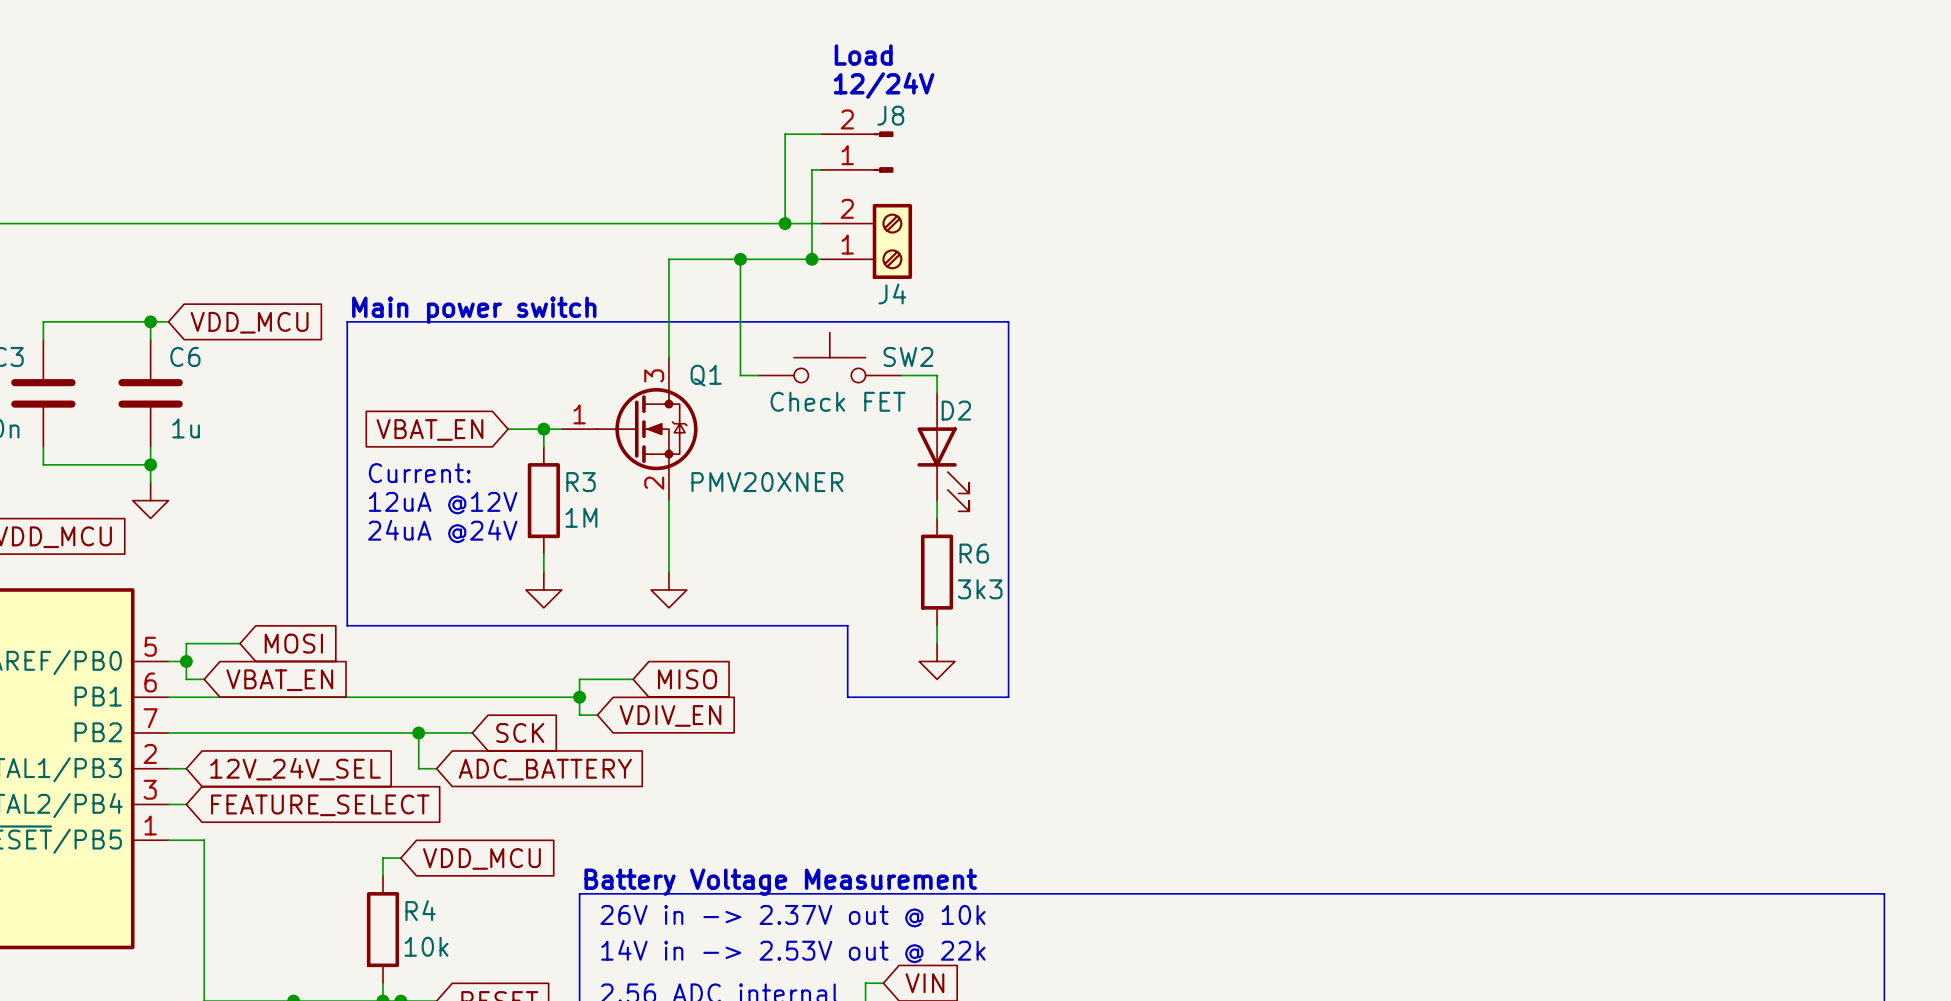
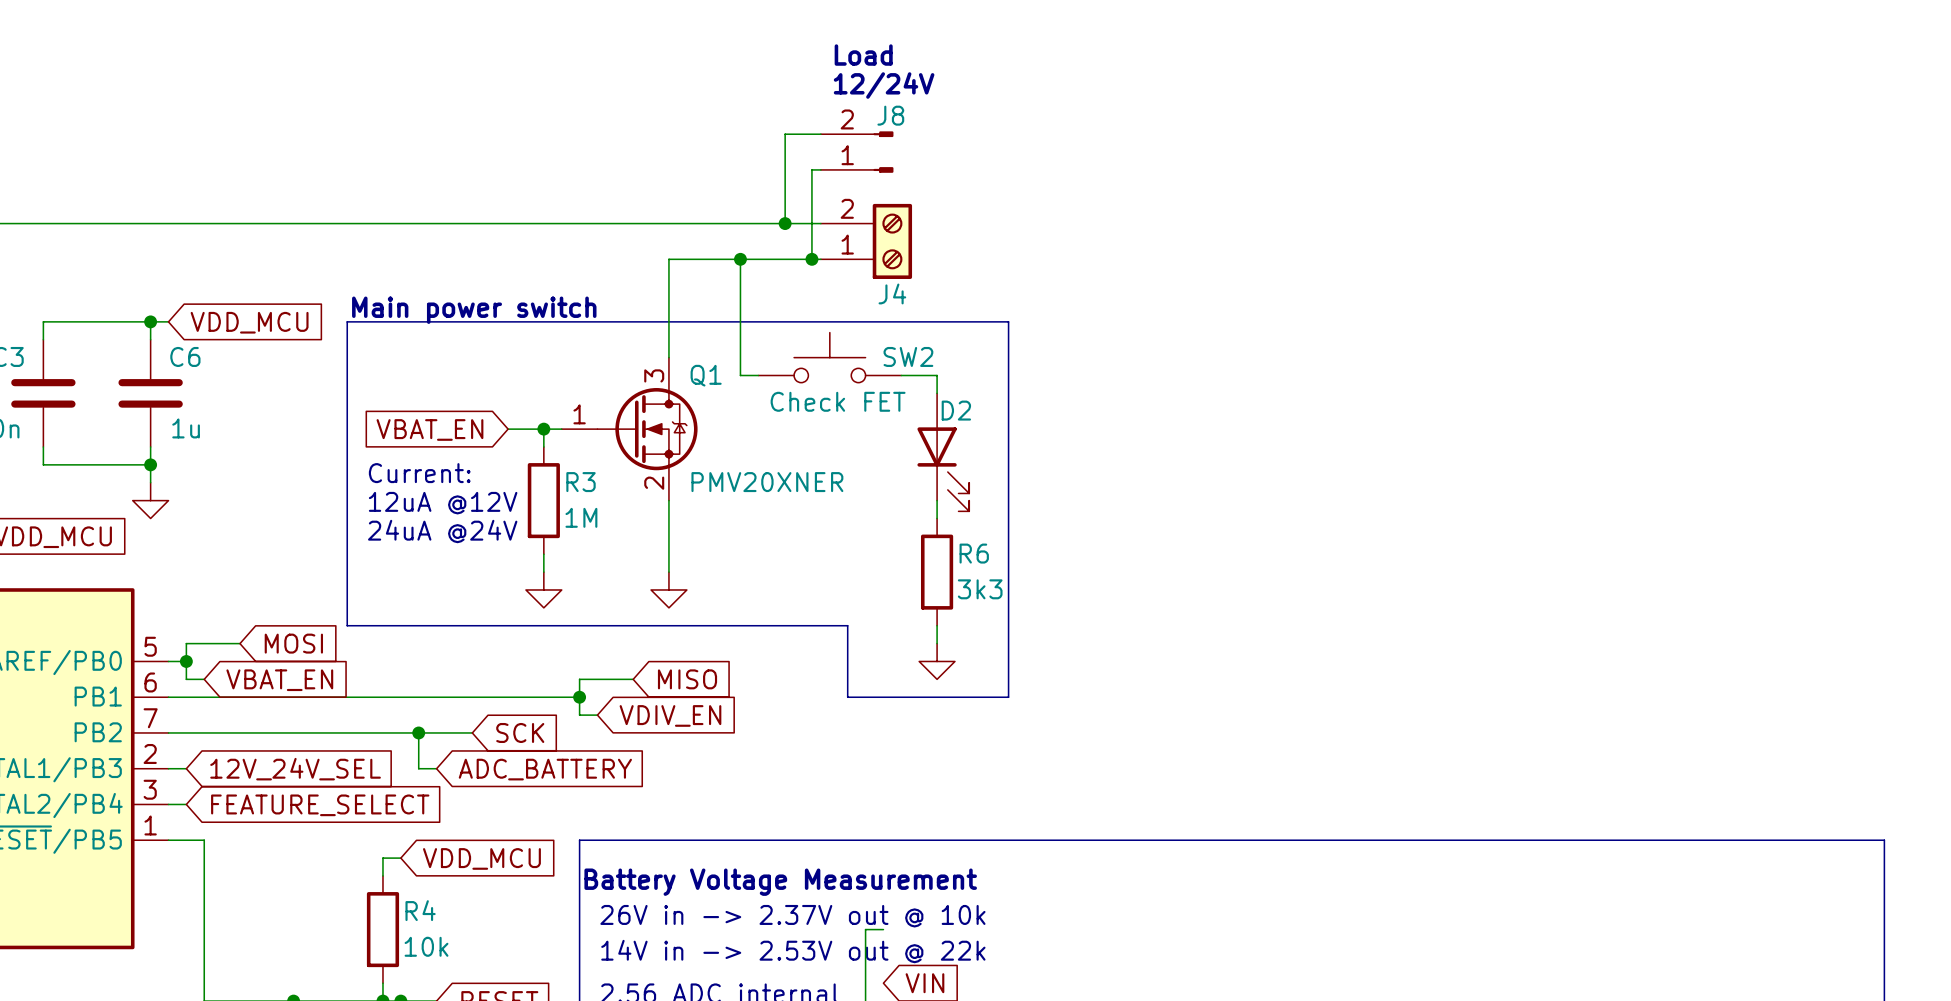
line: (579, 893) (1884, 893) -> (579, 893) (579, 840) (1884, 840) (1884, 893)
wire: (865, 983) (883, 983) -> (865, 983) (865, 929) (883, 929)

